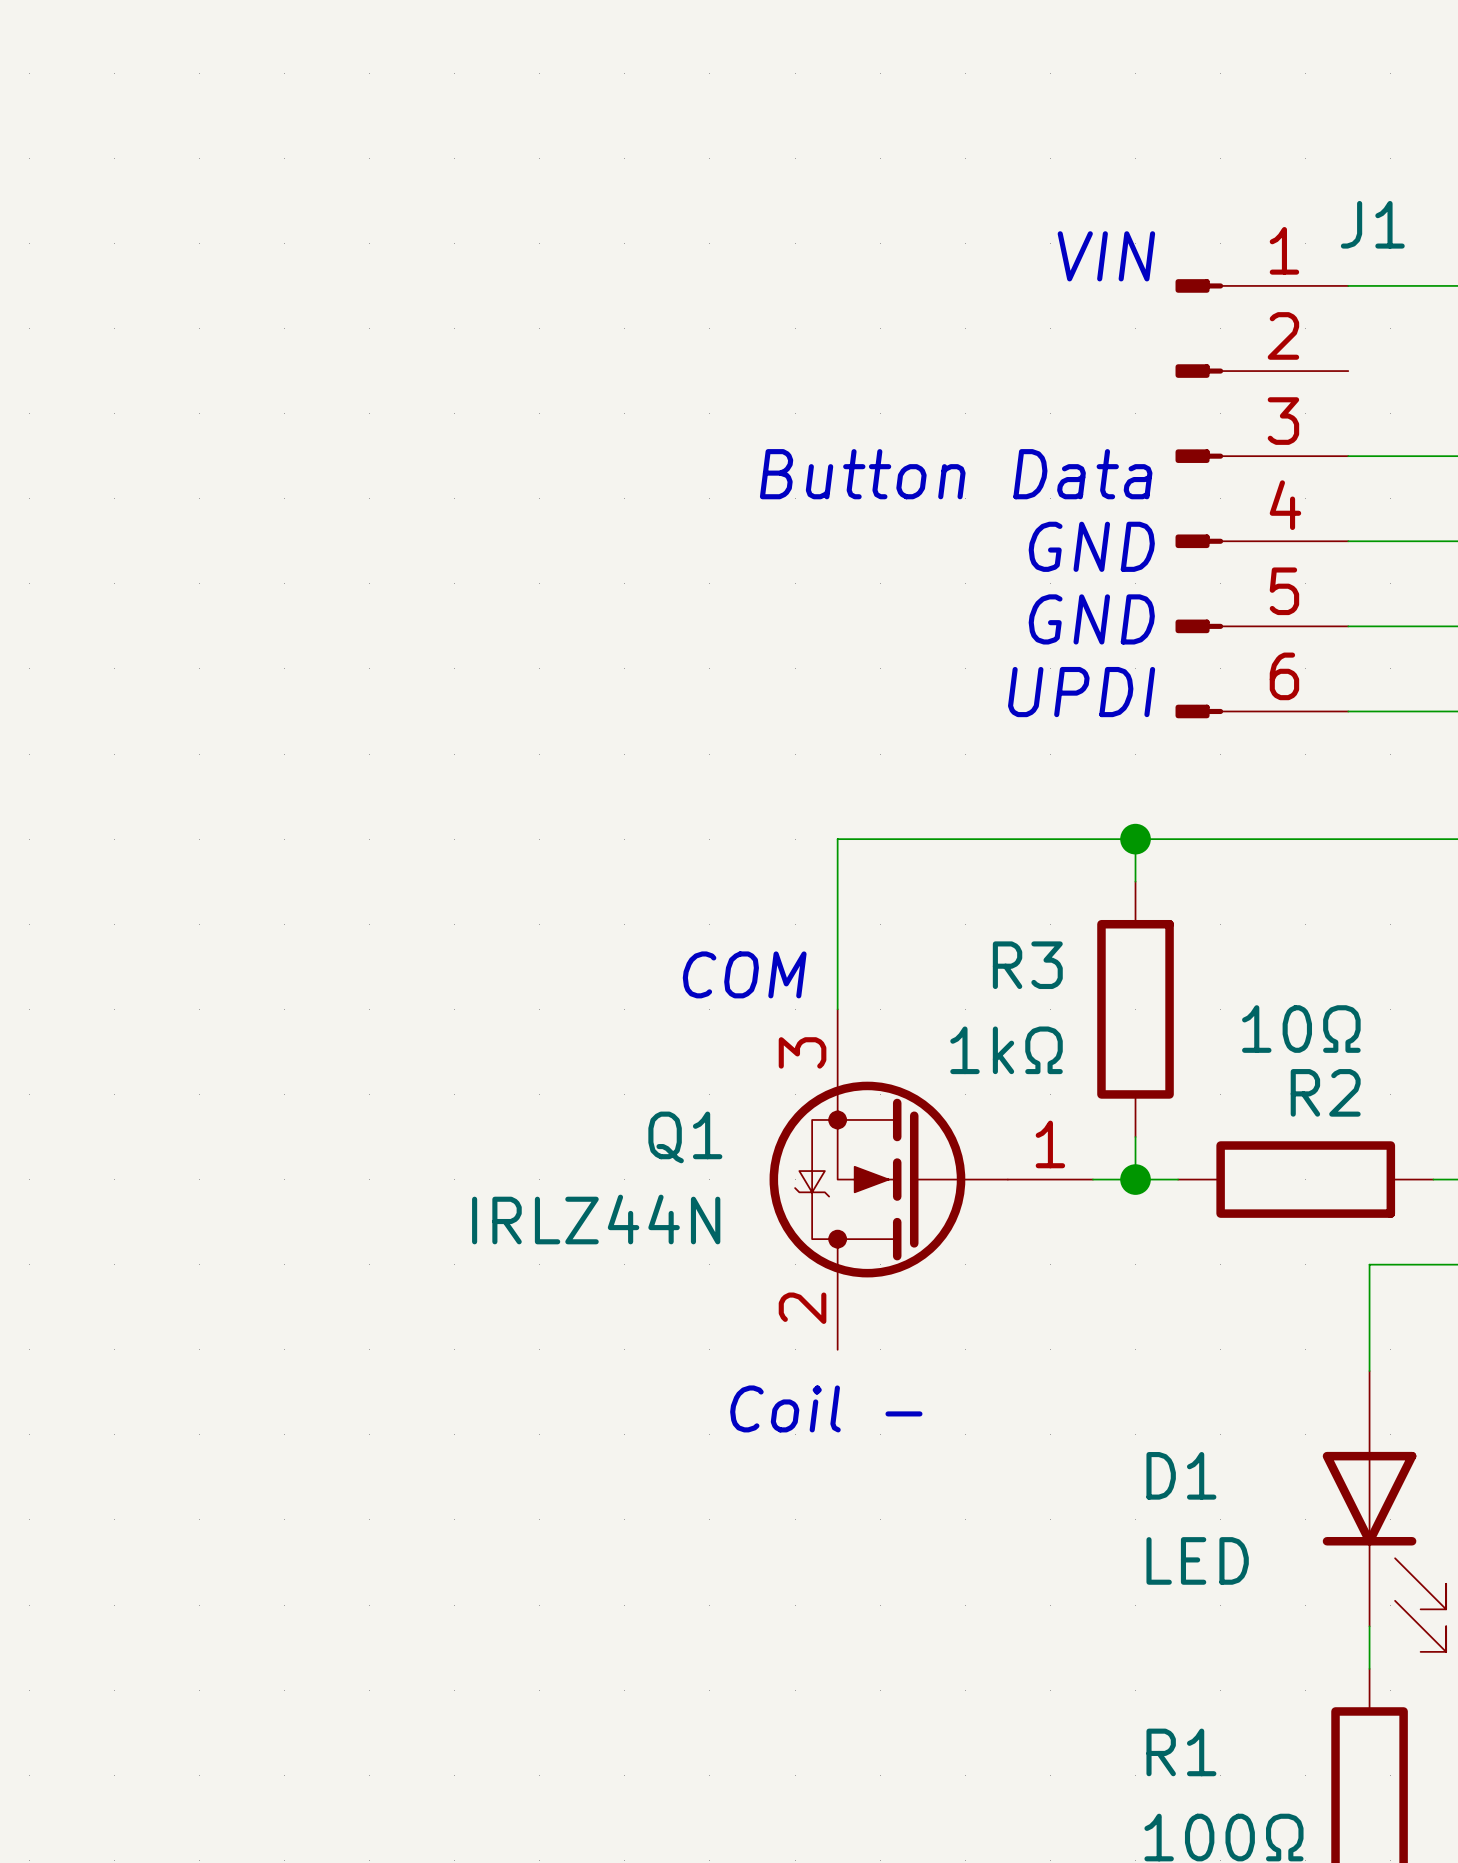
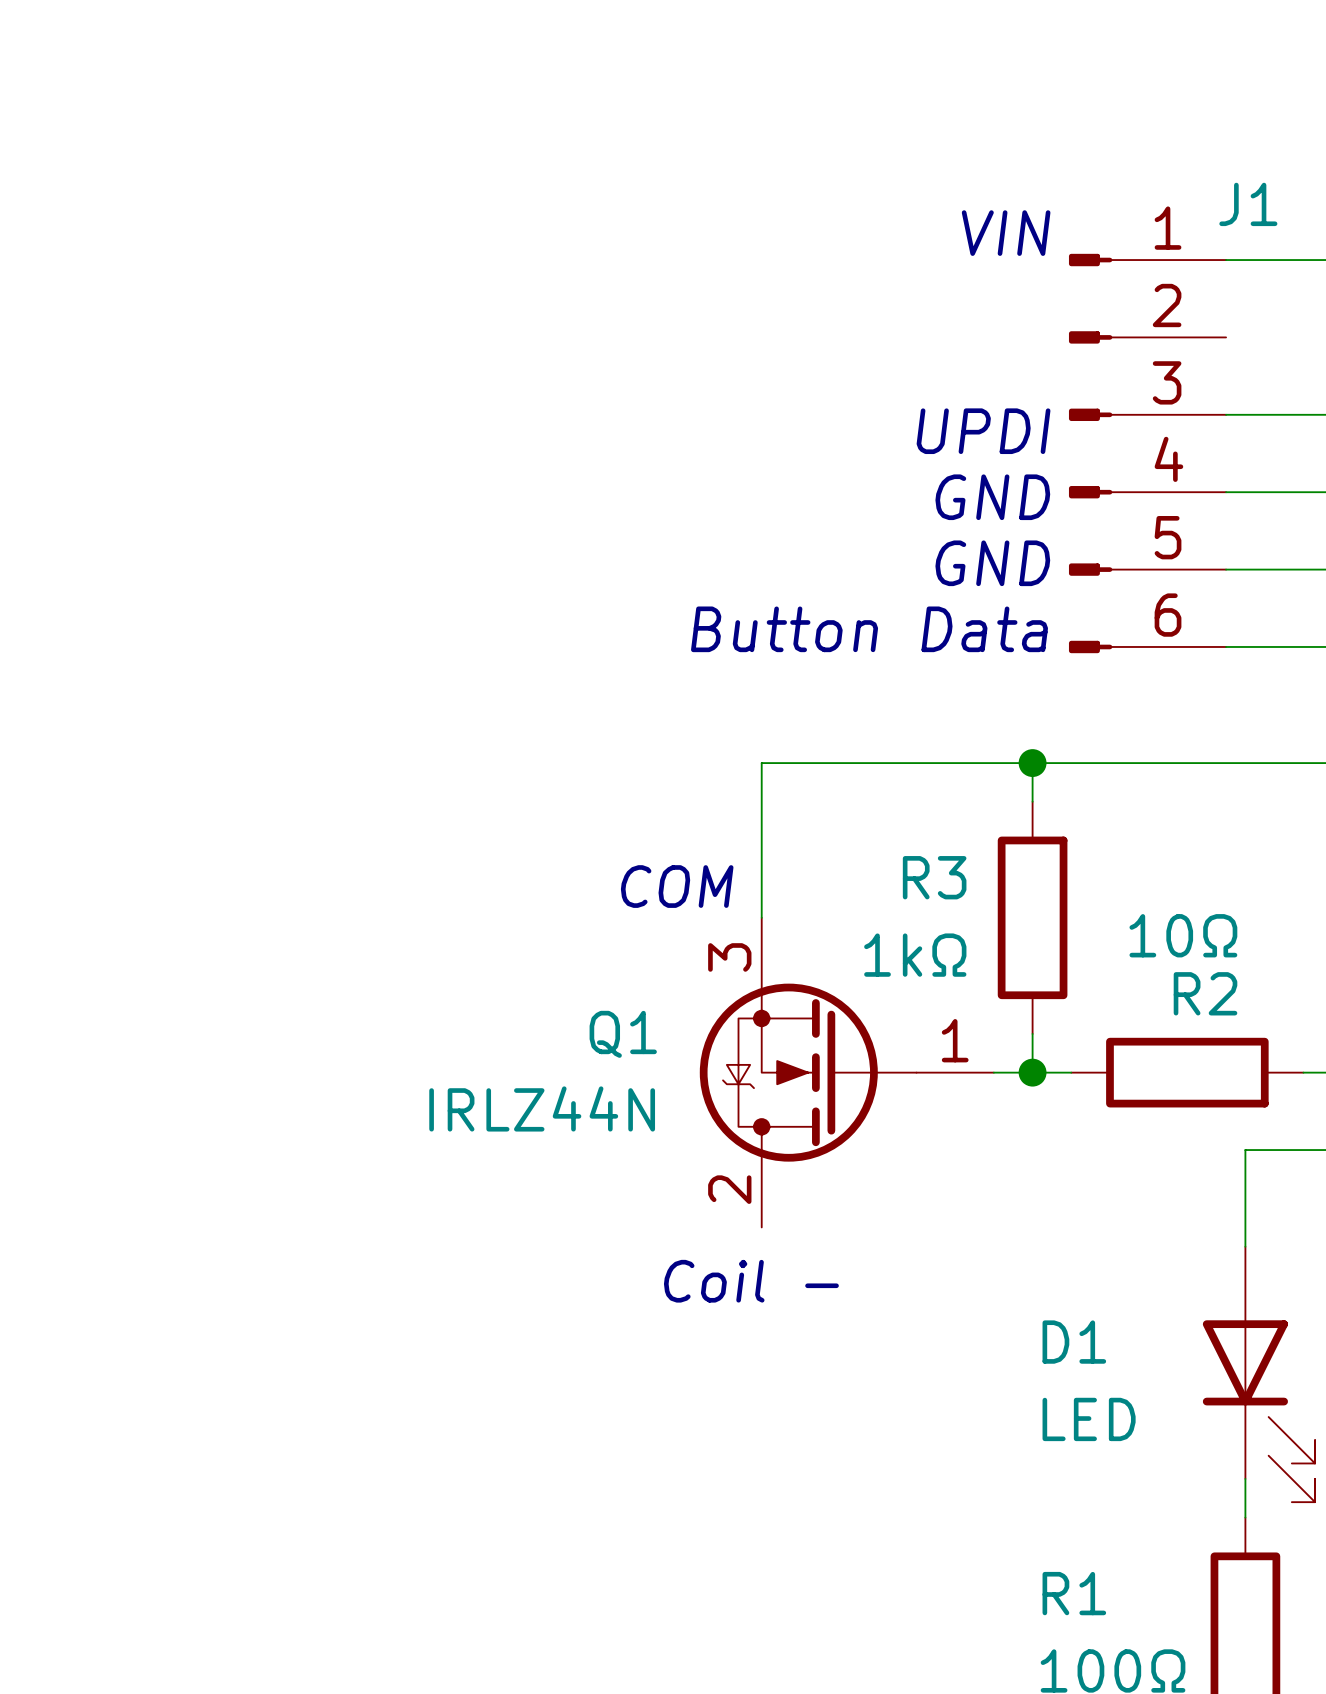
text: Button Data (956, 474) -> UPDI (983, 431)
text: UPDI (1081, 692) -> Button Data (869, 629)

